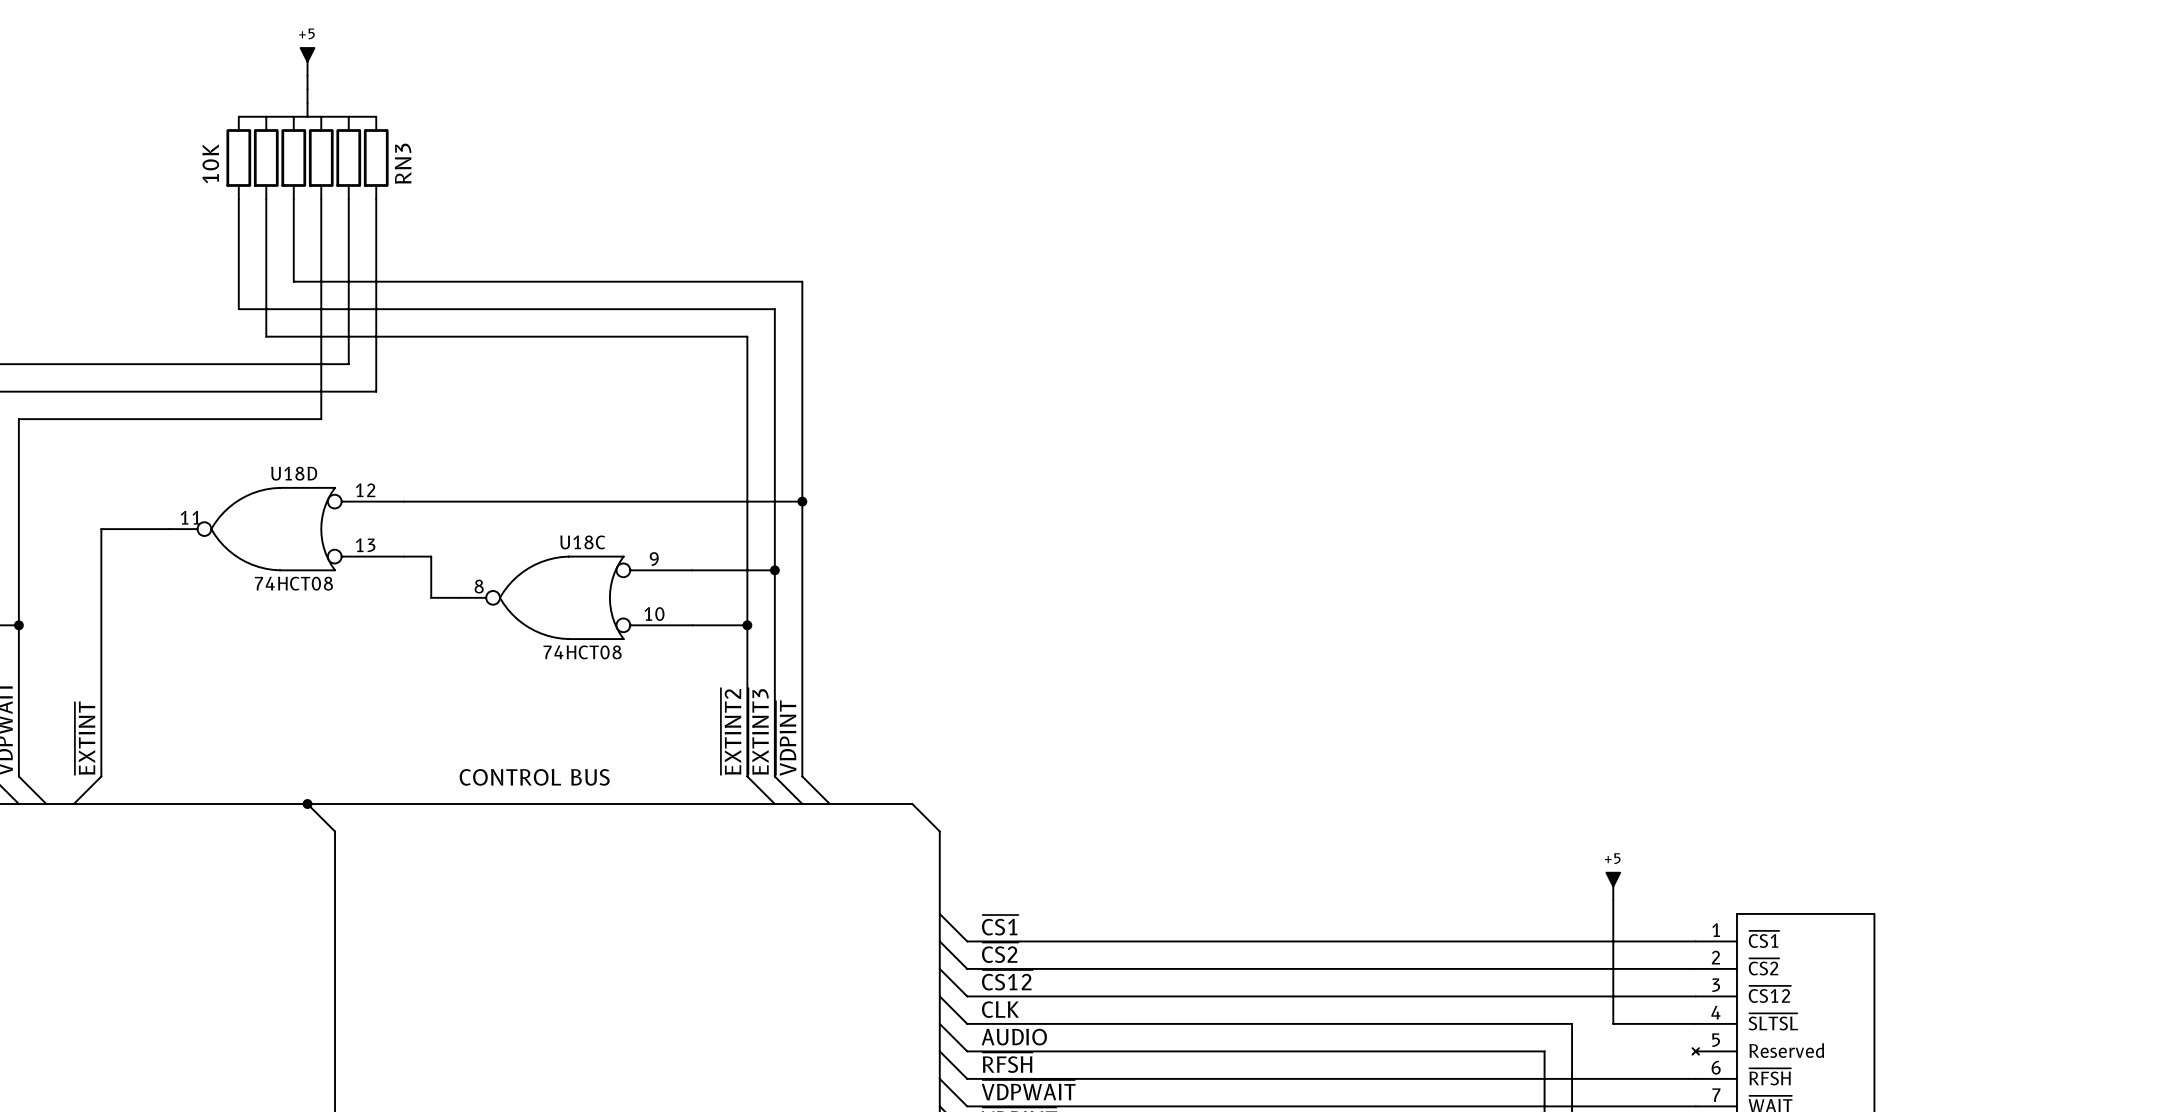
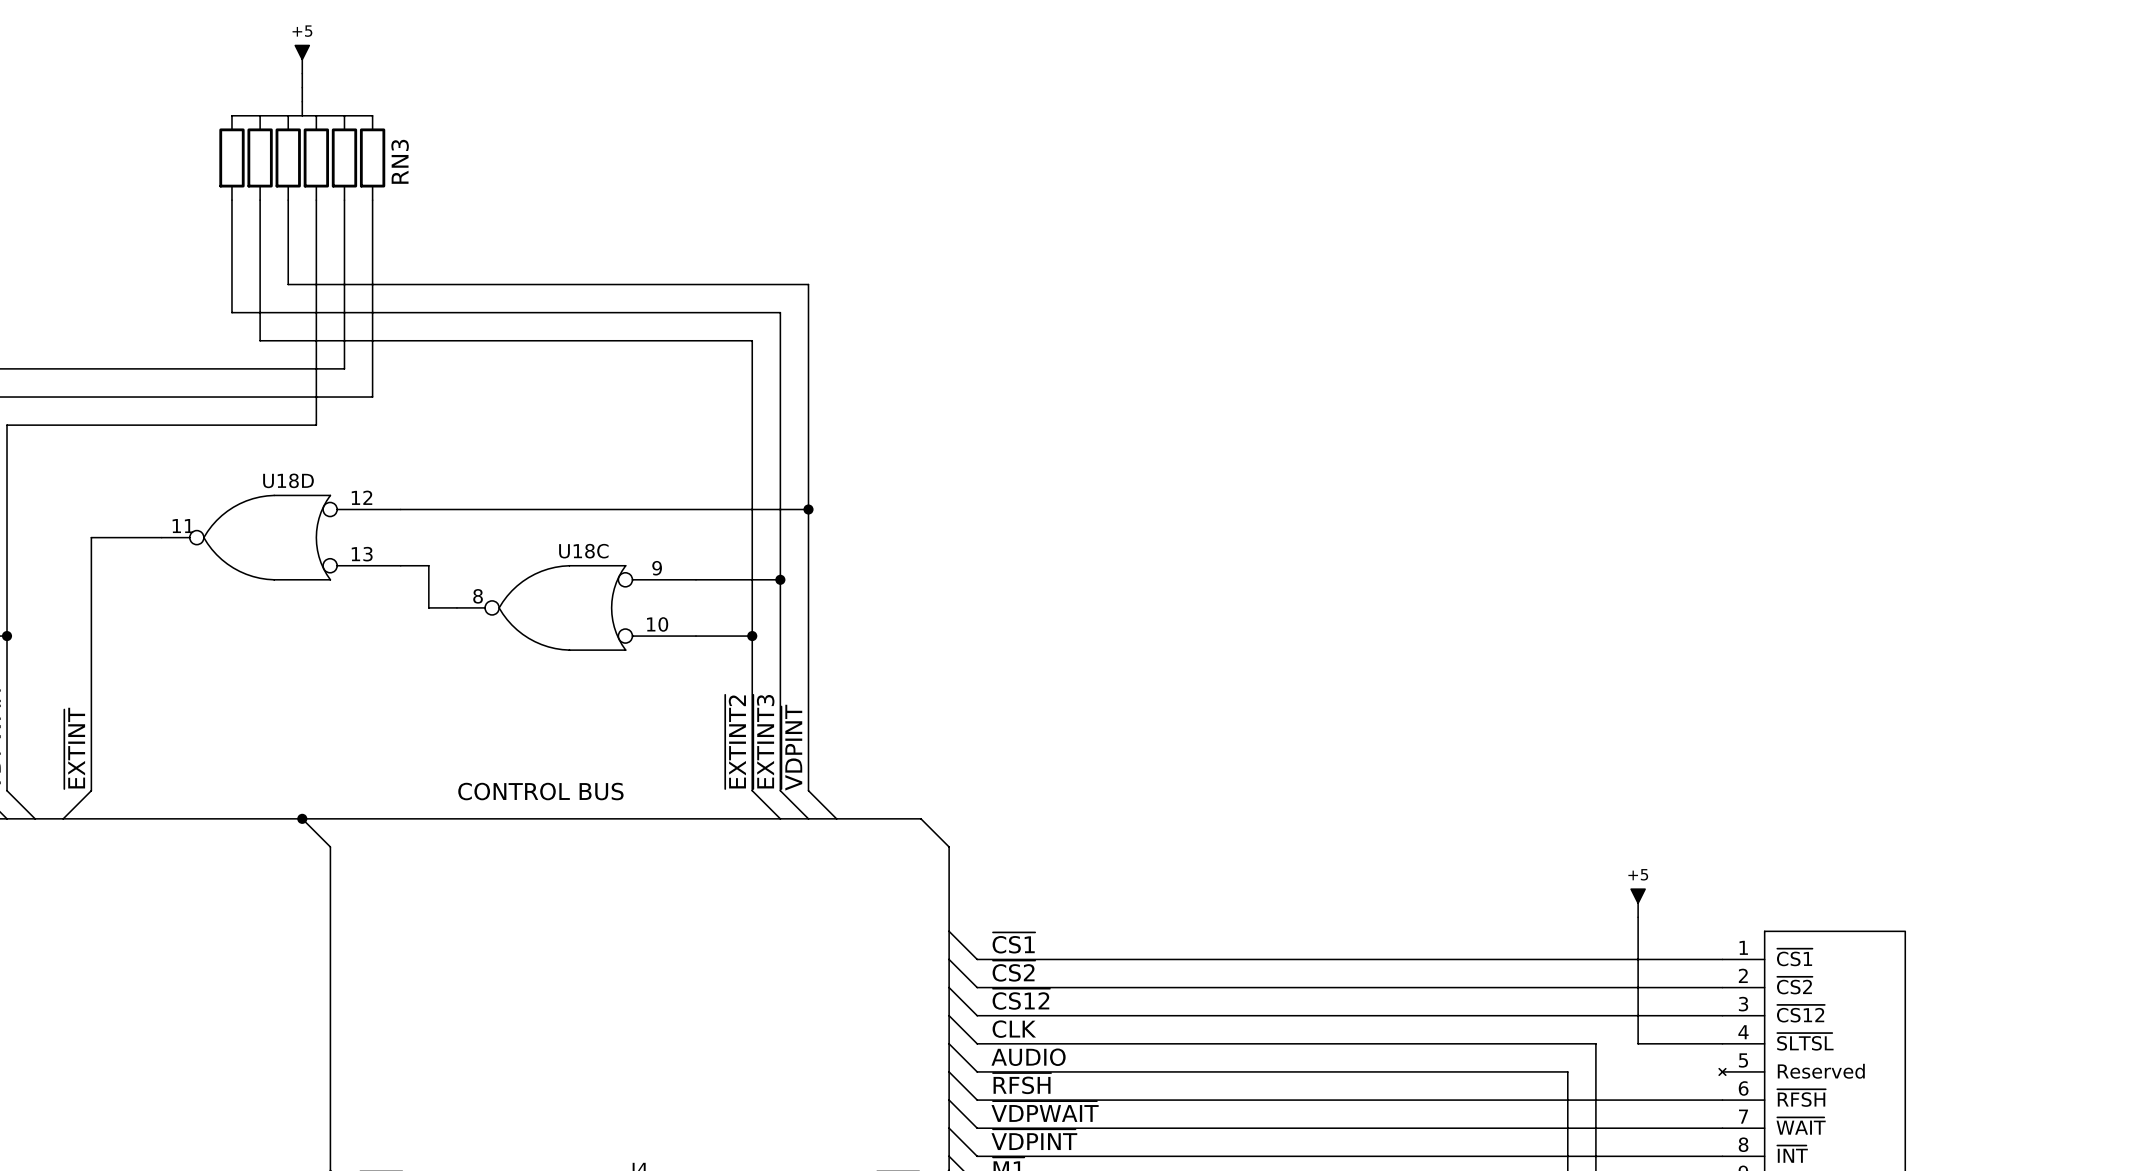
RN3 value: 10K (210, 163) -> none
U18D value: 74HCT08 (293, 583) -> none
U18C value: 74HCT08 (582, 652) -> none

